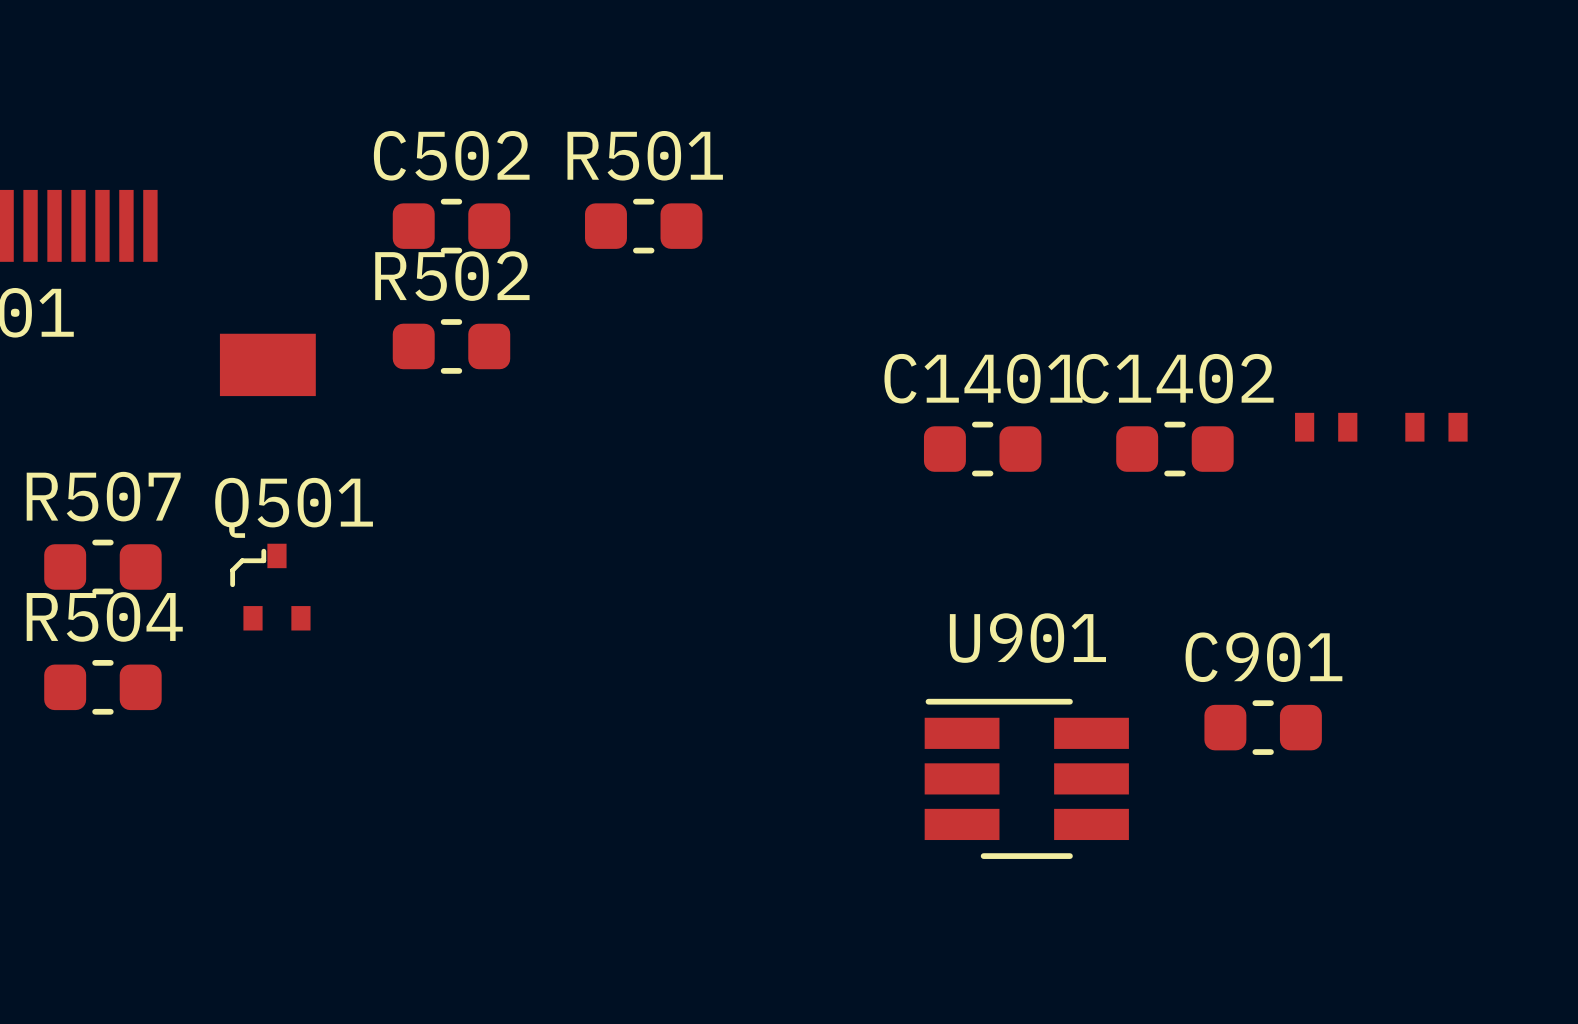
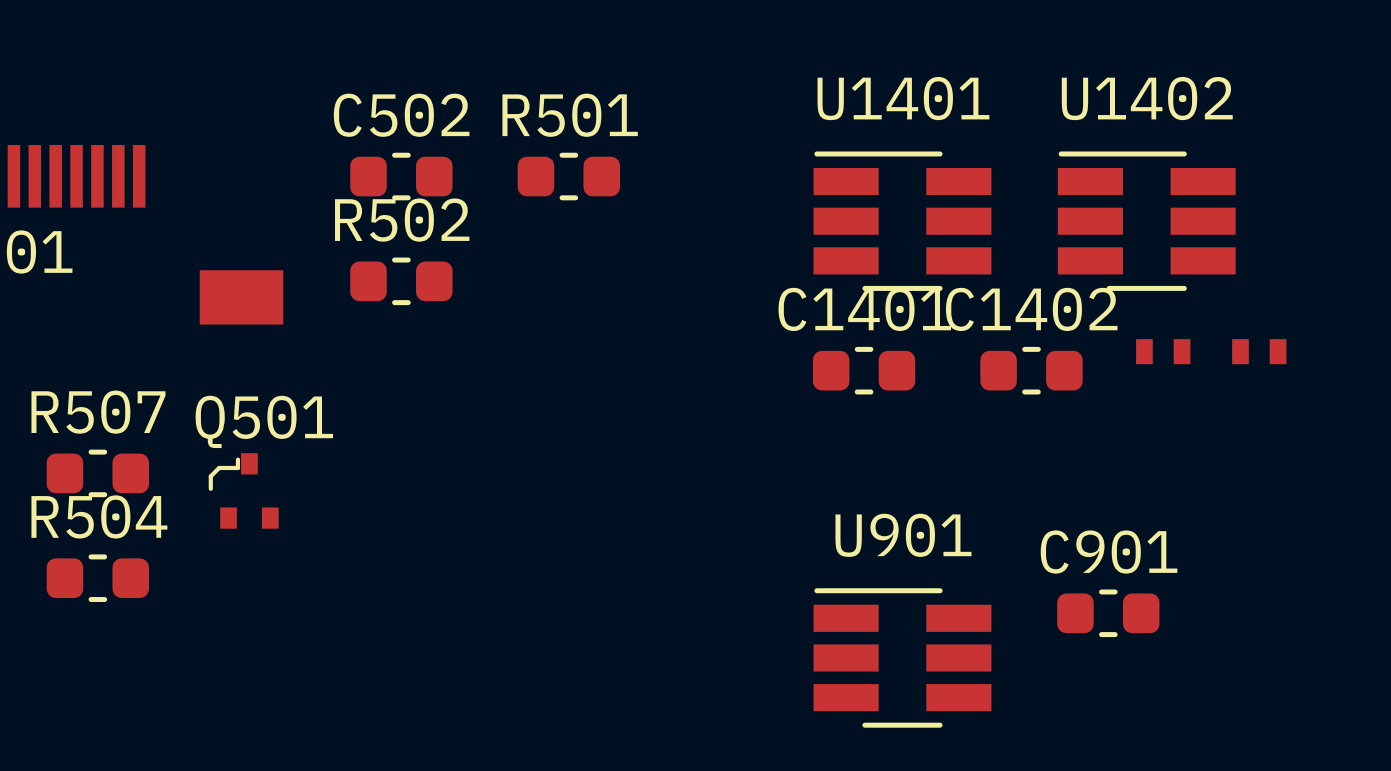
U1401: none -> (902, 221)
U1402: none -> (1146, 221)

